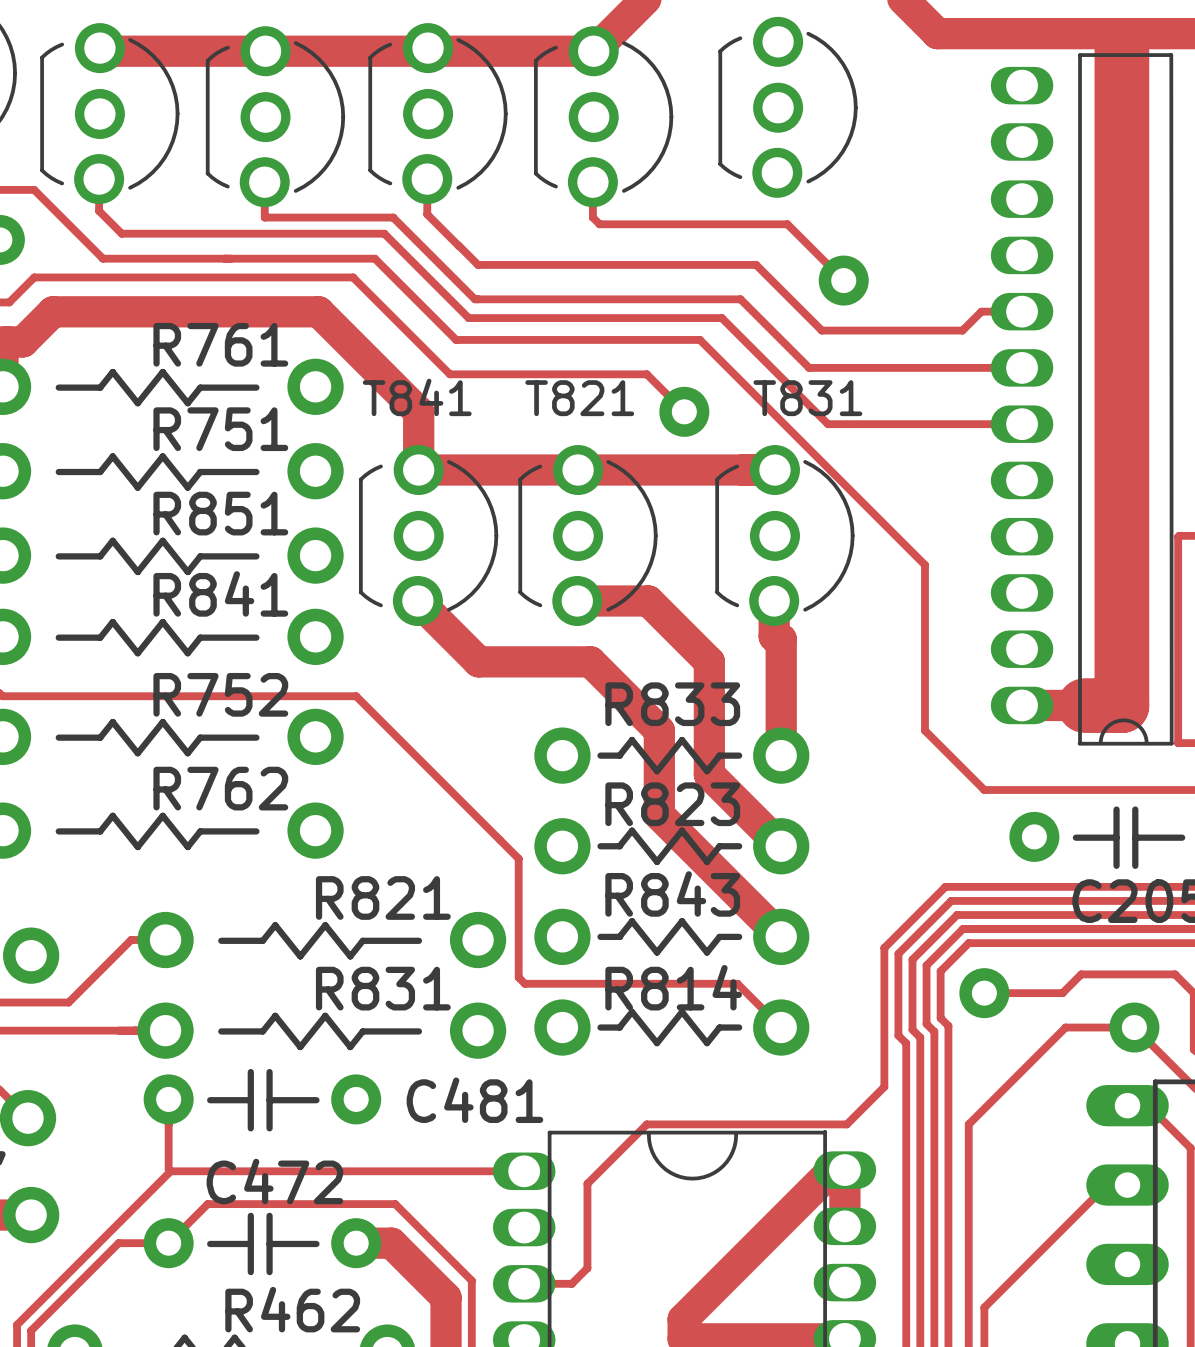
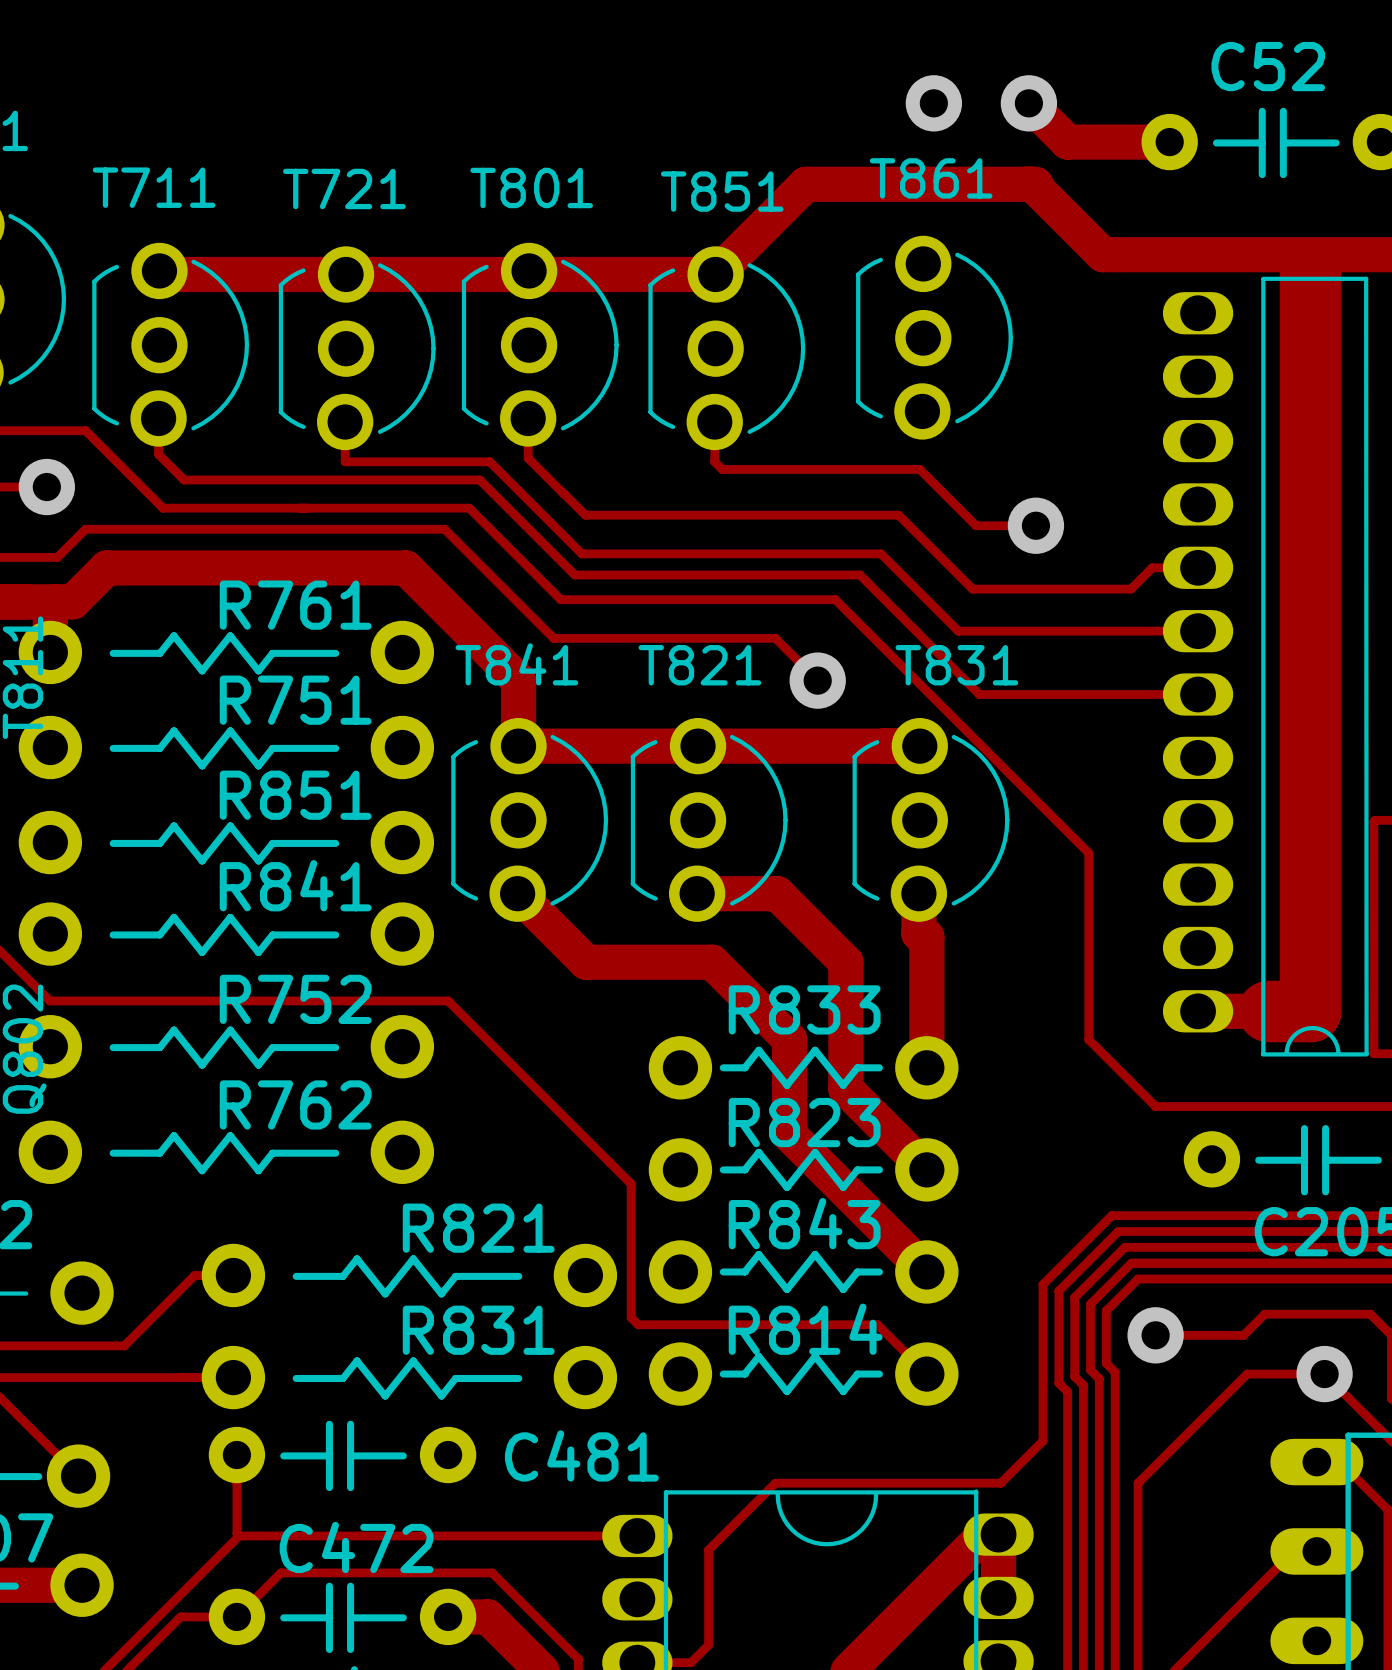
track: (774, 224) (787, 224) (843, 280) -> (919, 469) (976, 525) (1035, 525)
via position: (843, 280) -> (1035, 525)

